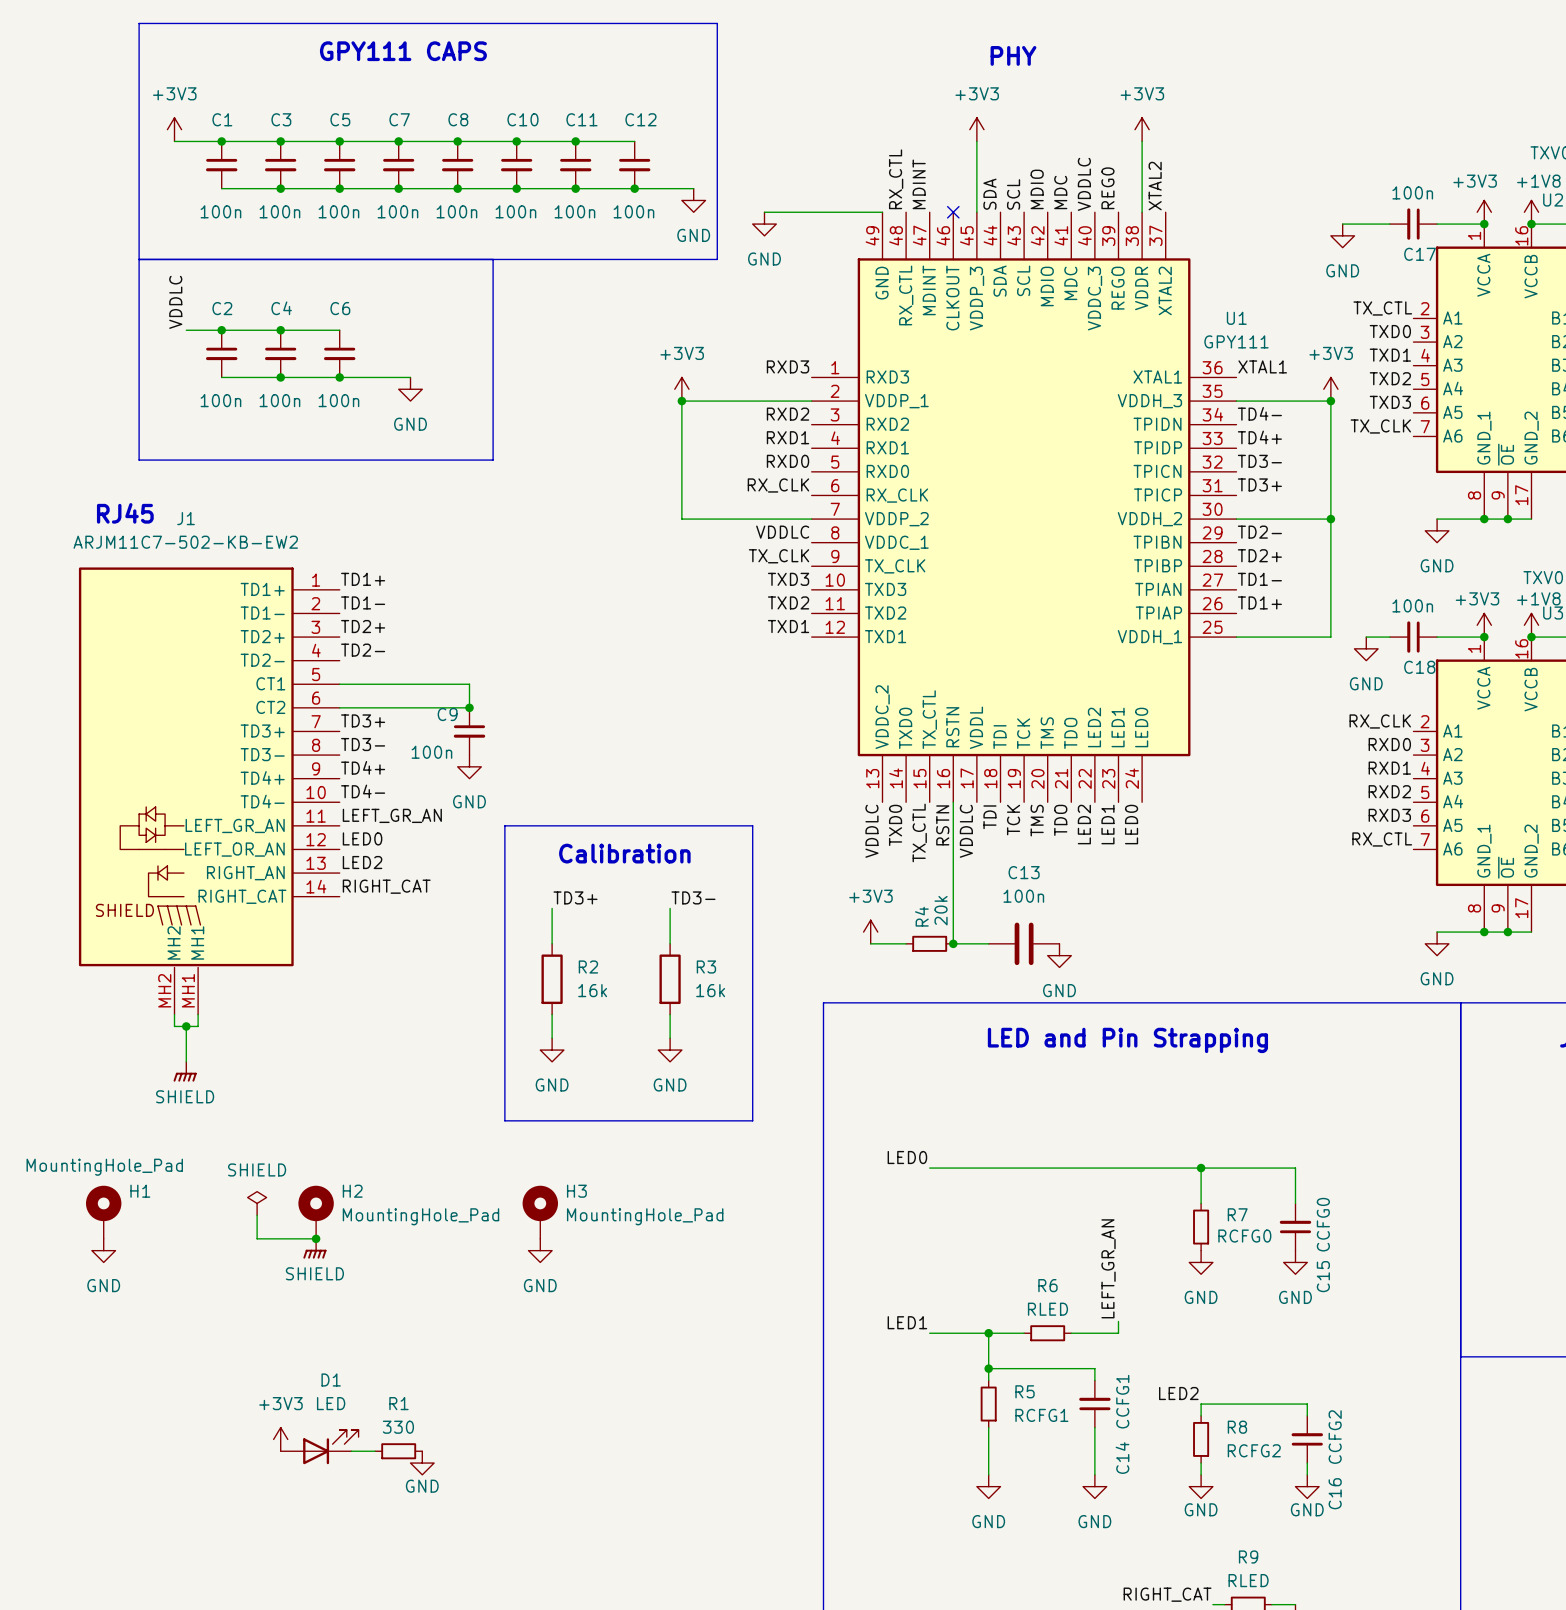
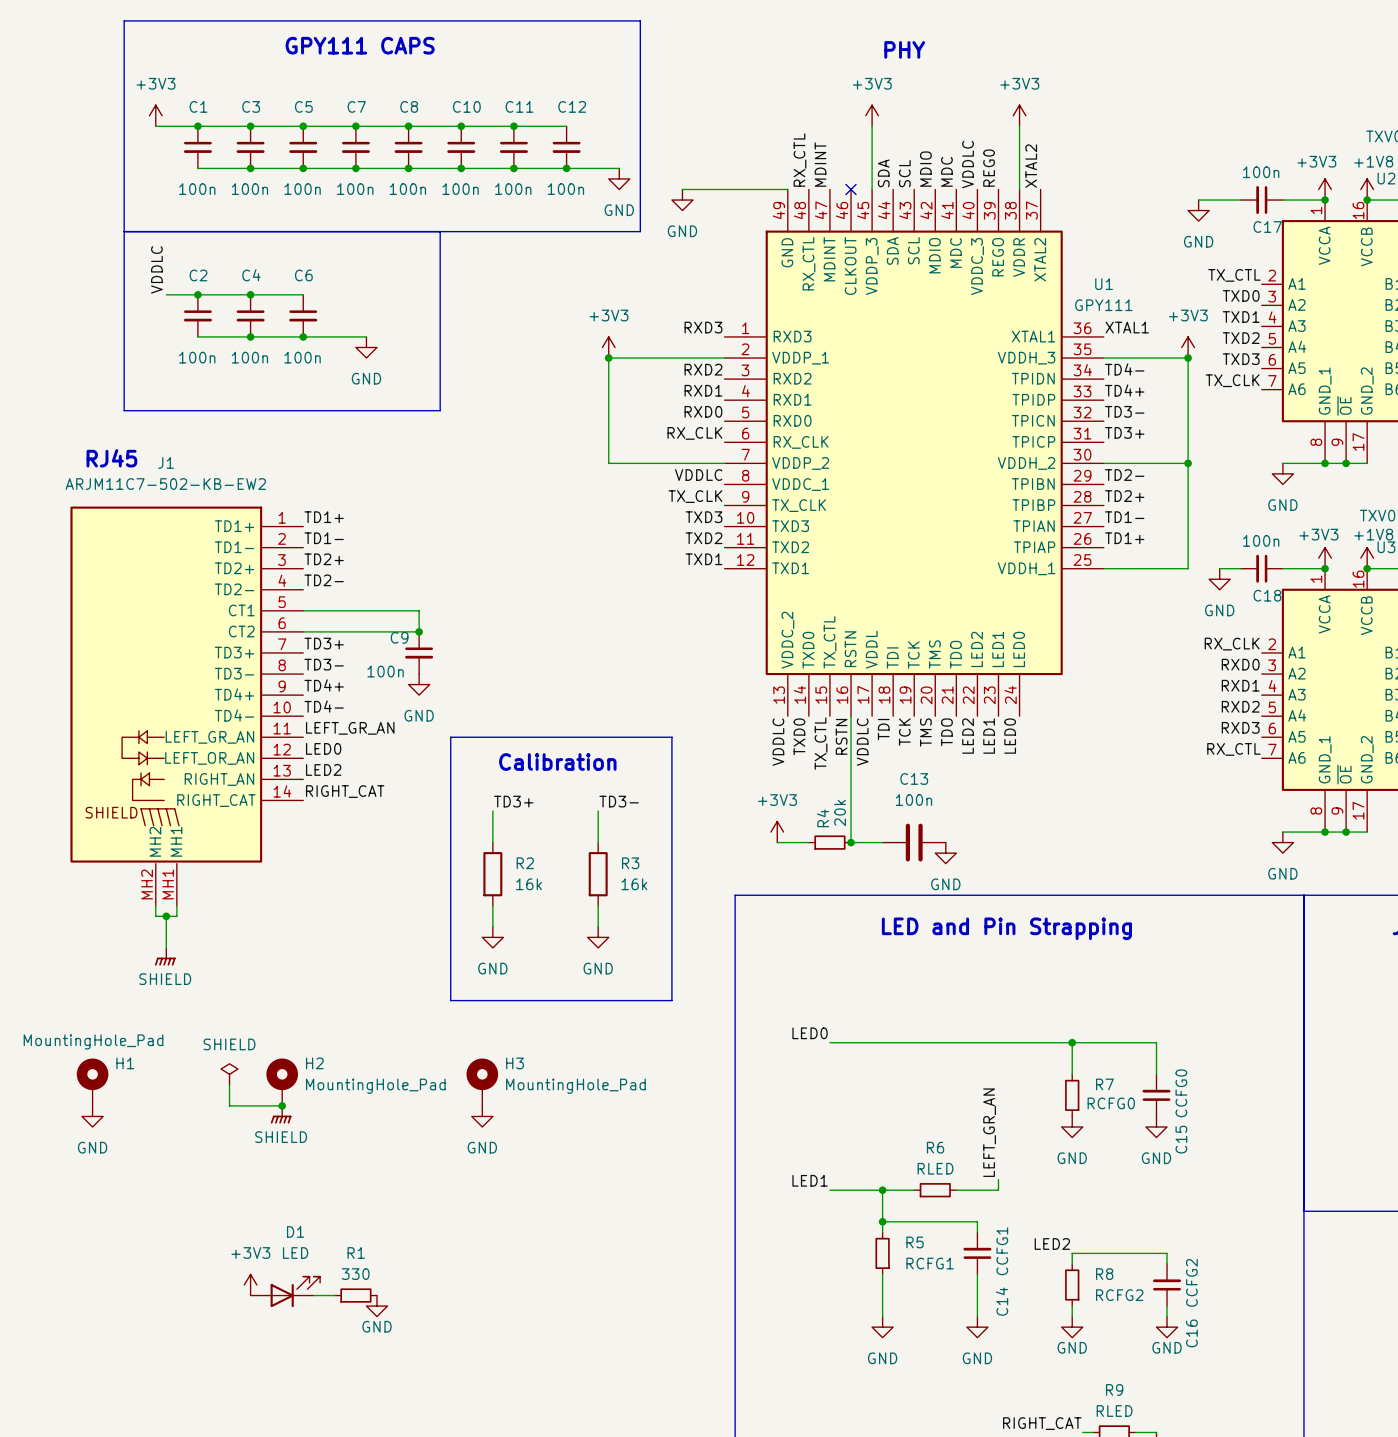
J1 symbol: [78, 567, 340, 1015] -> [70, 506, 304, 906]

